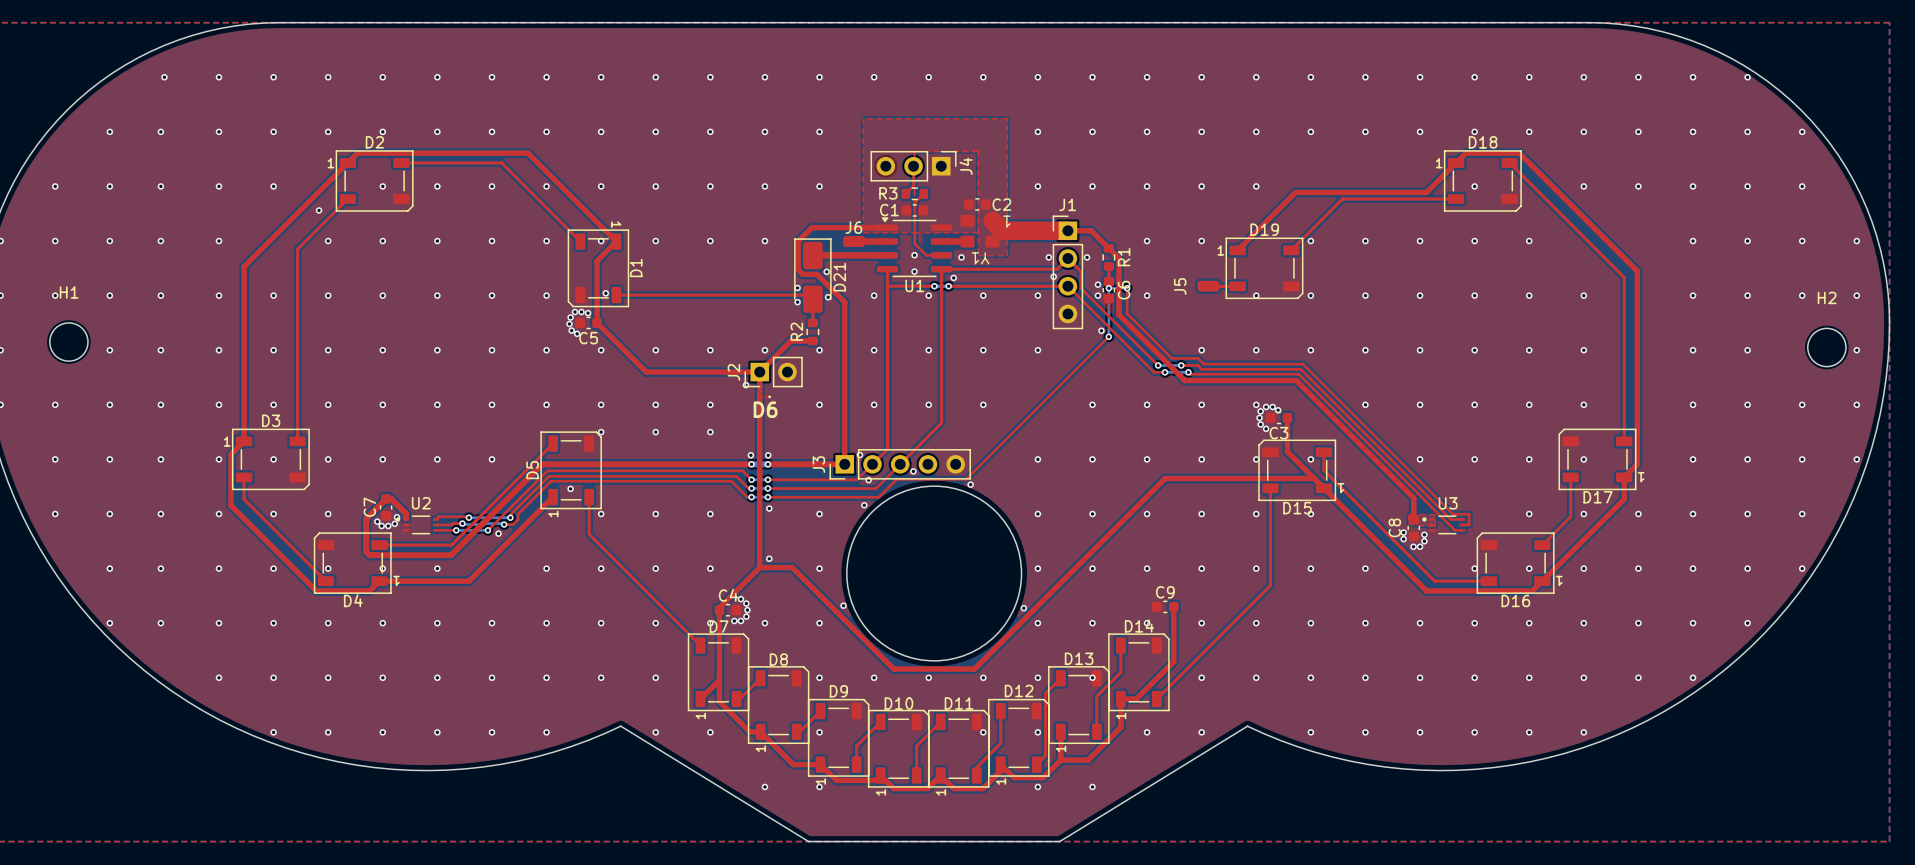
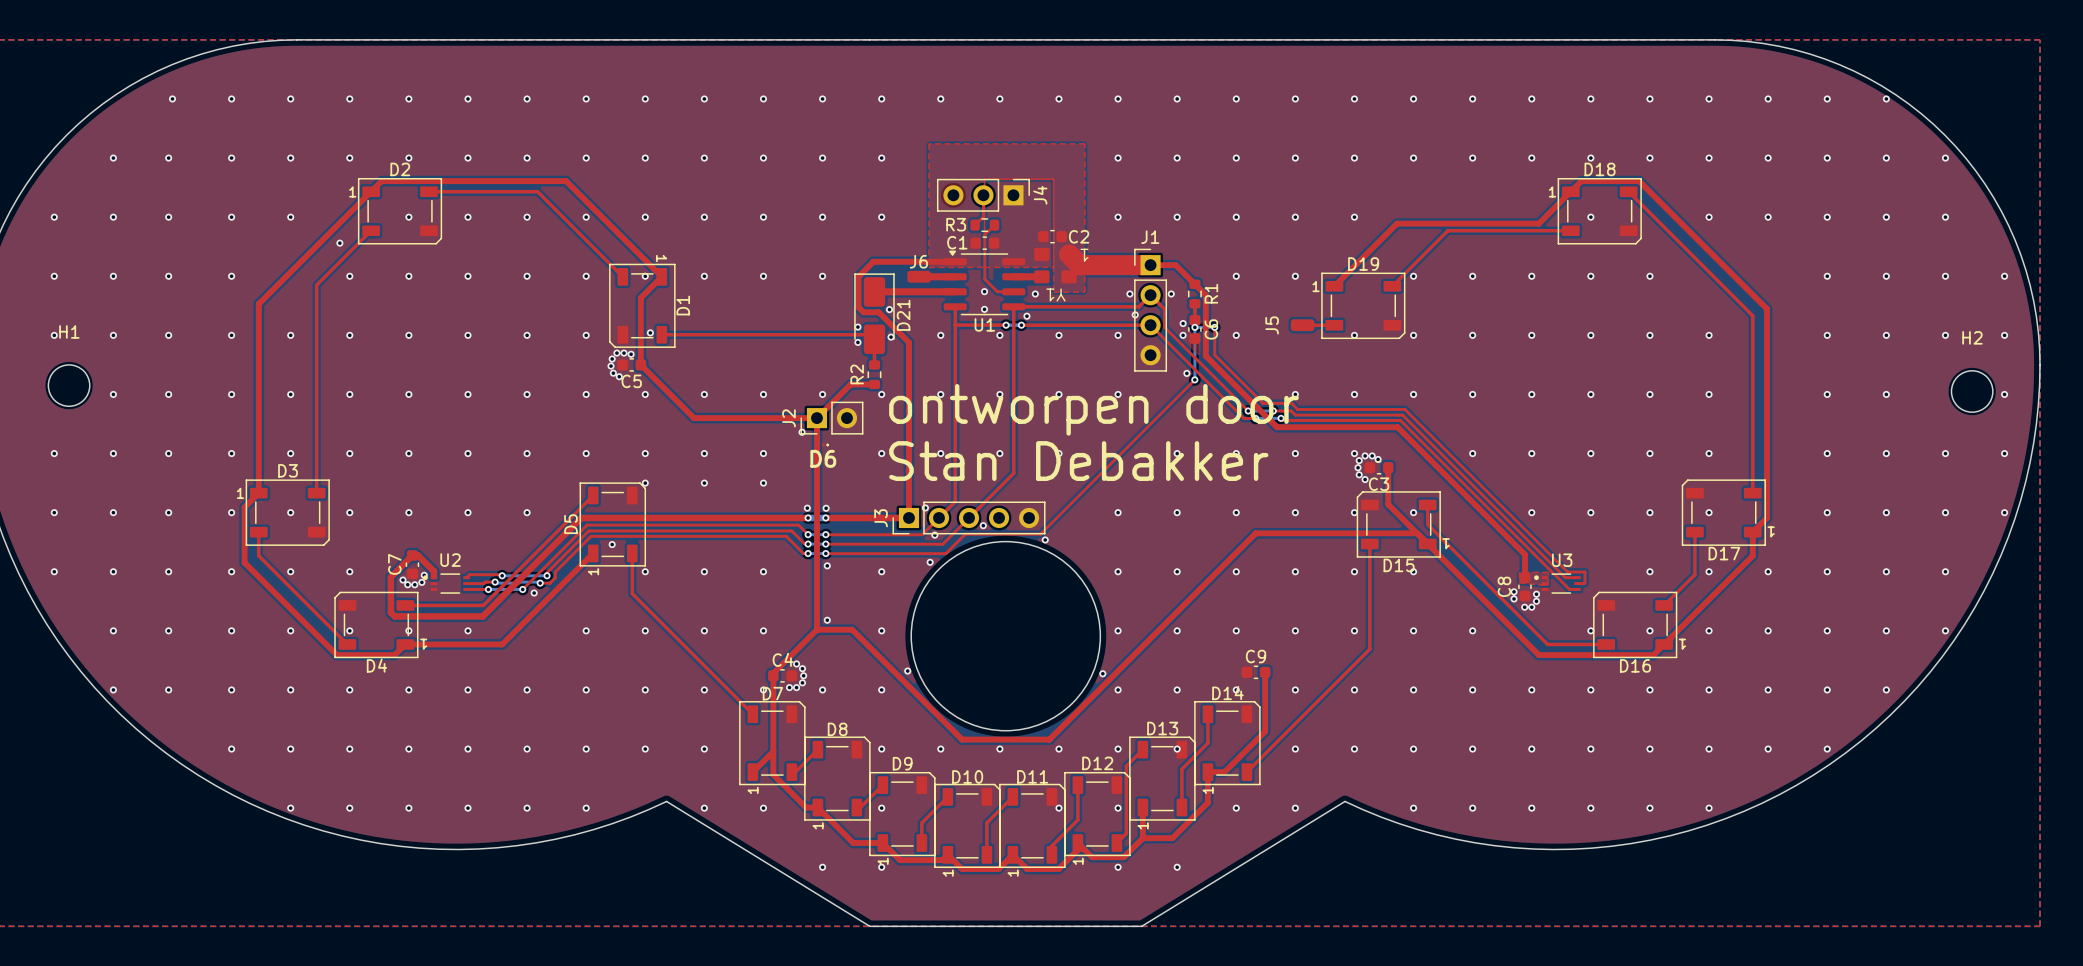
text: none -> ontworpen door (1093, 409)
text: none -> Stan Debakker (1078, 461)

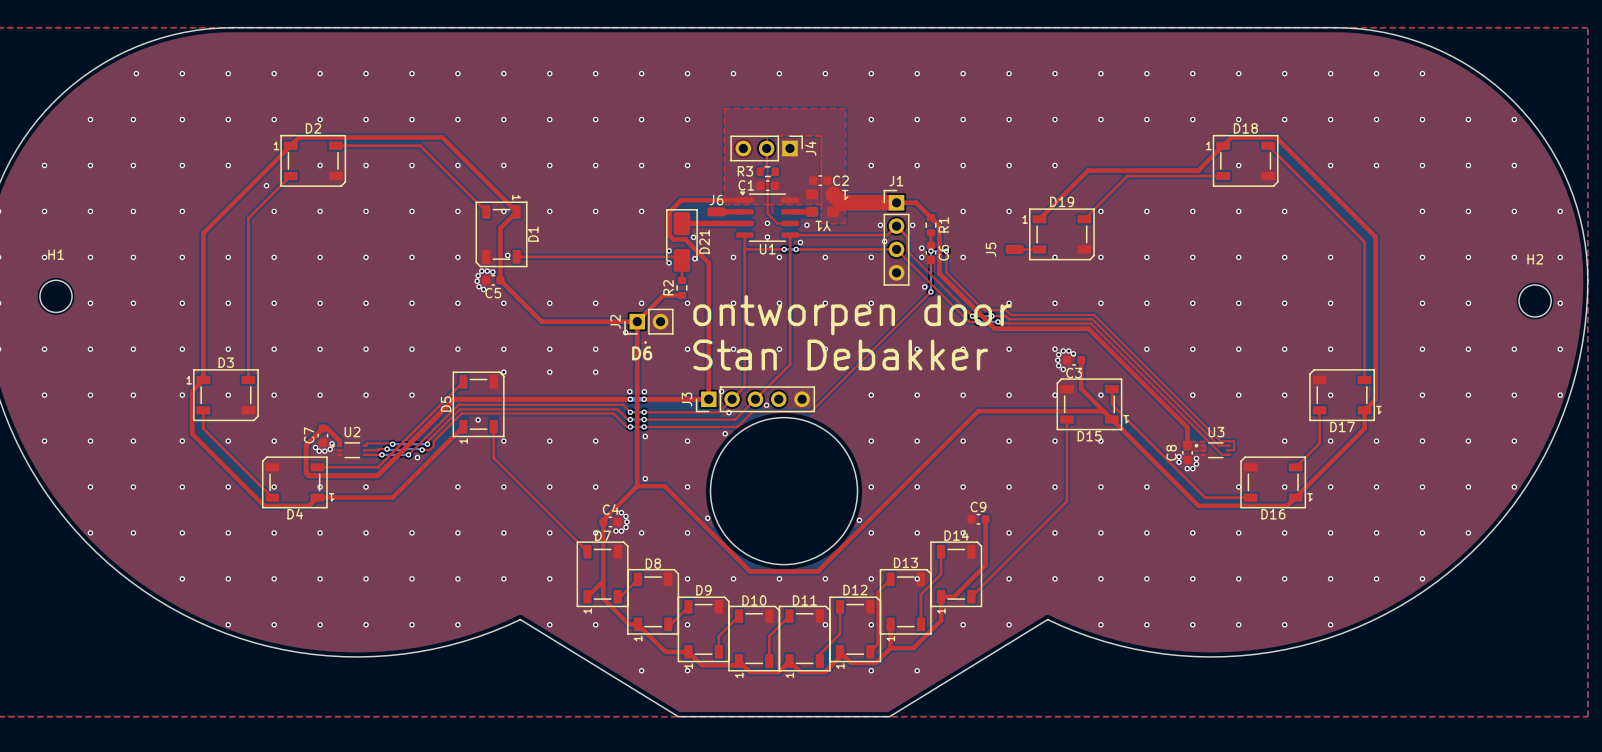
via: (1886, 98) -> none
via: (1045, 539) -> none

